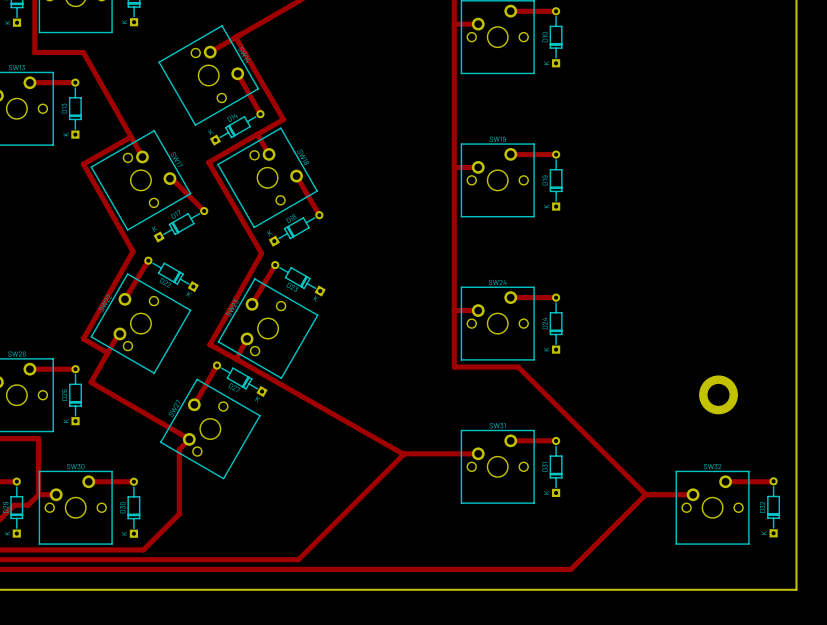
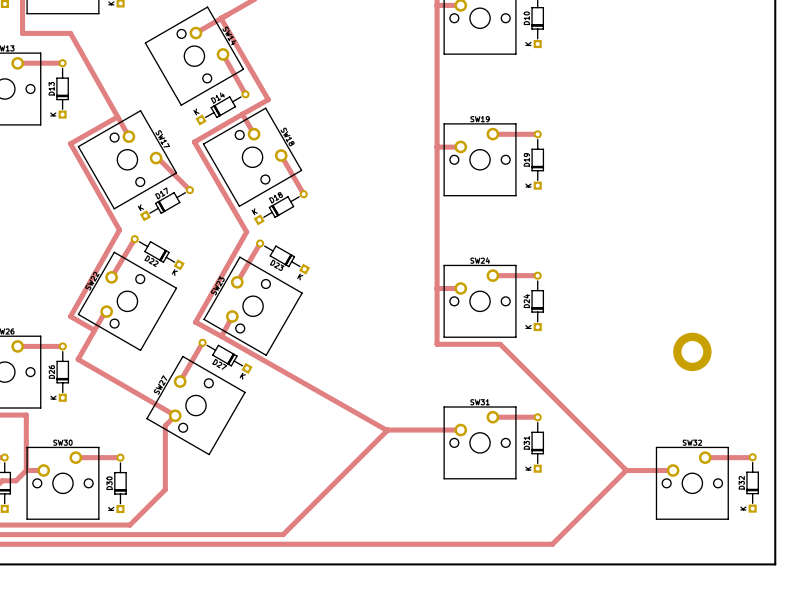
part position: (718, 394) -> (692, 351)

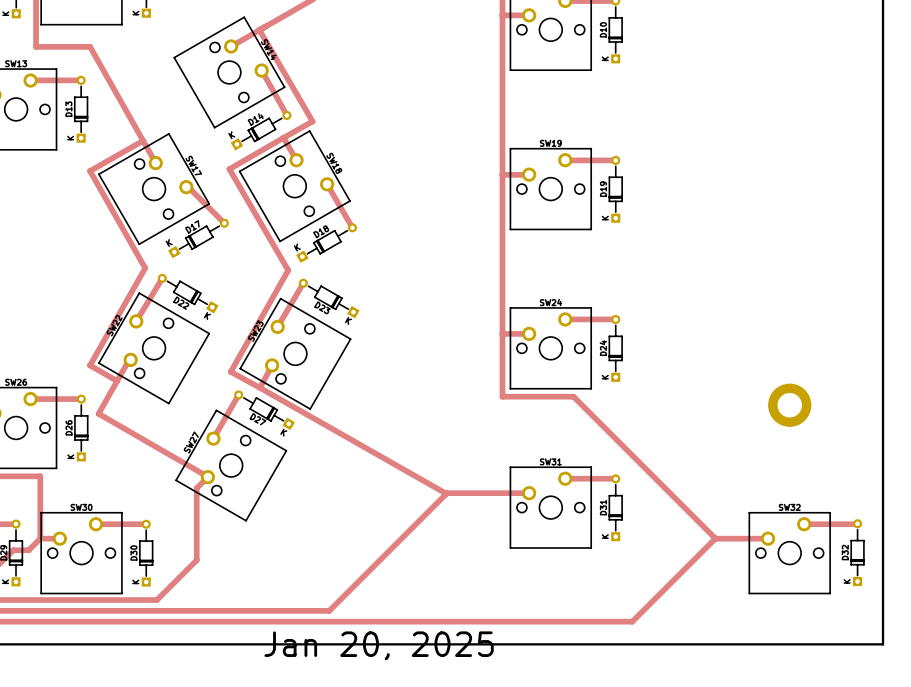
text: none -> Jan 20, 2025 (379, 645)

